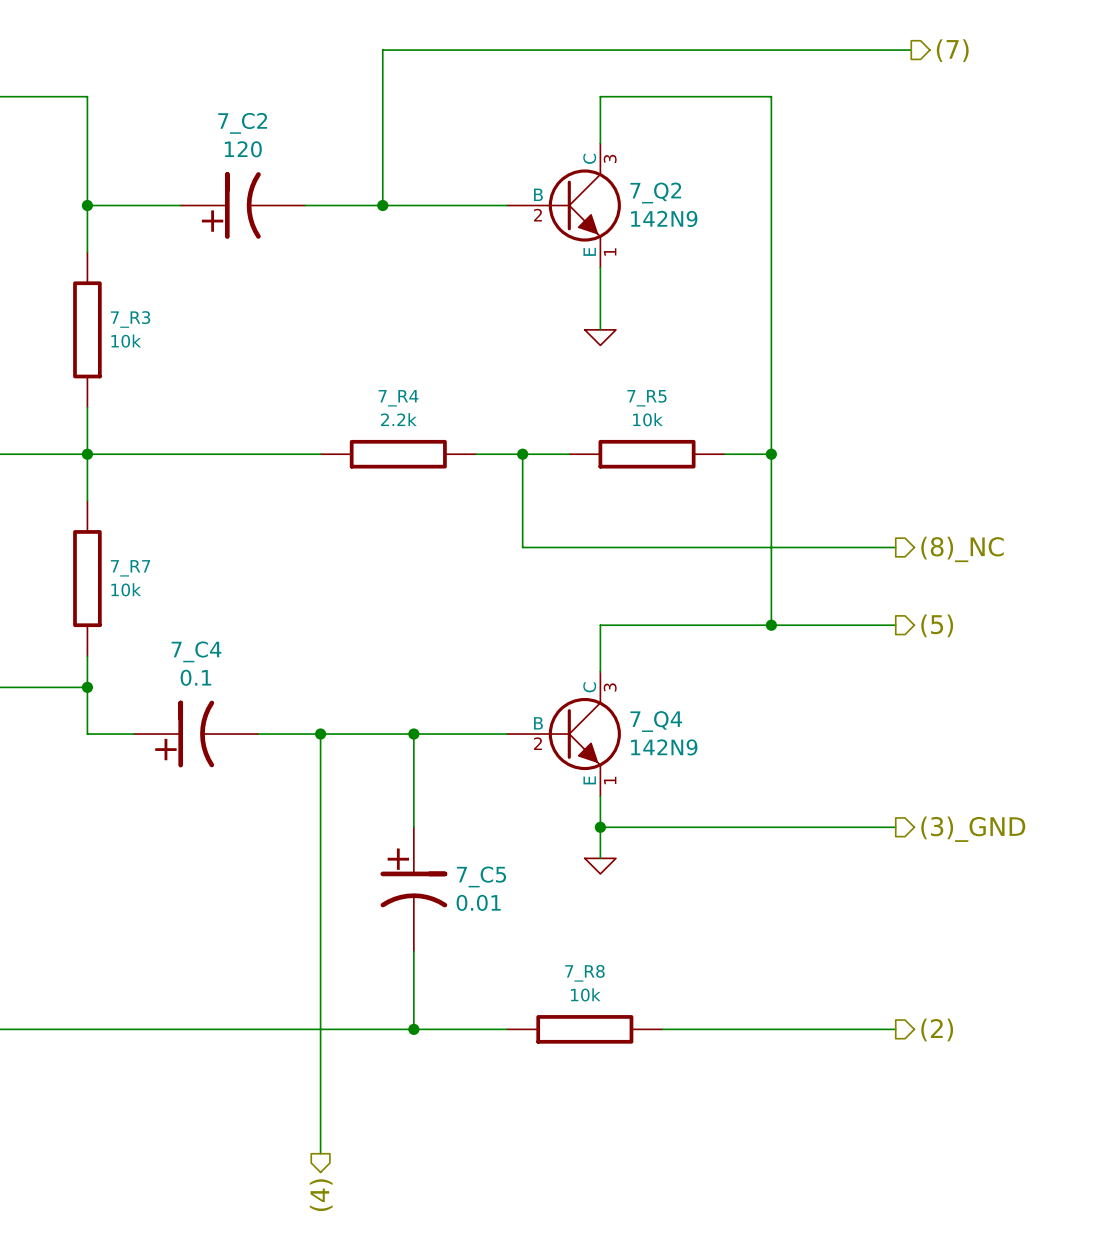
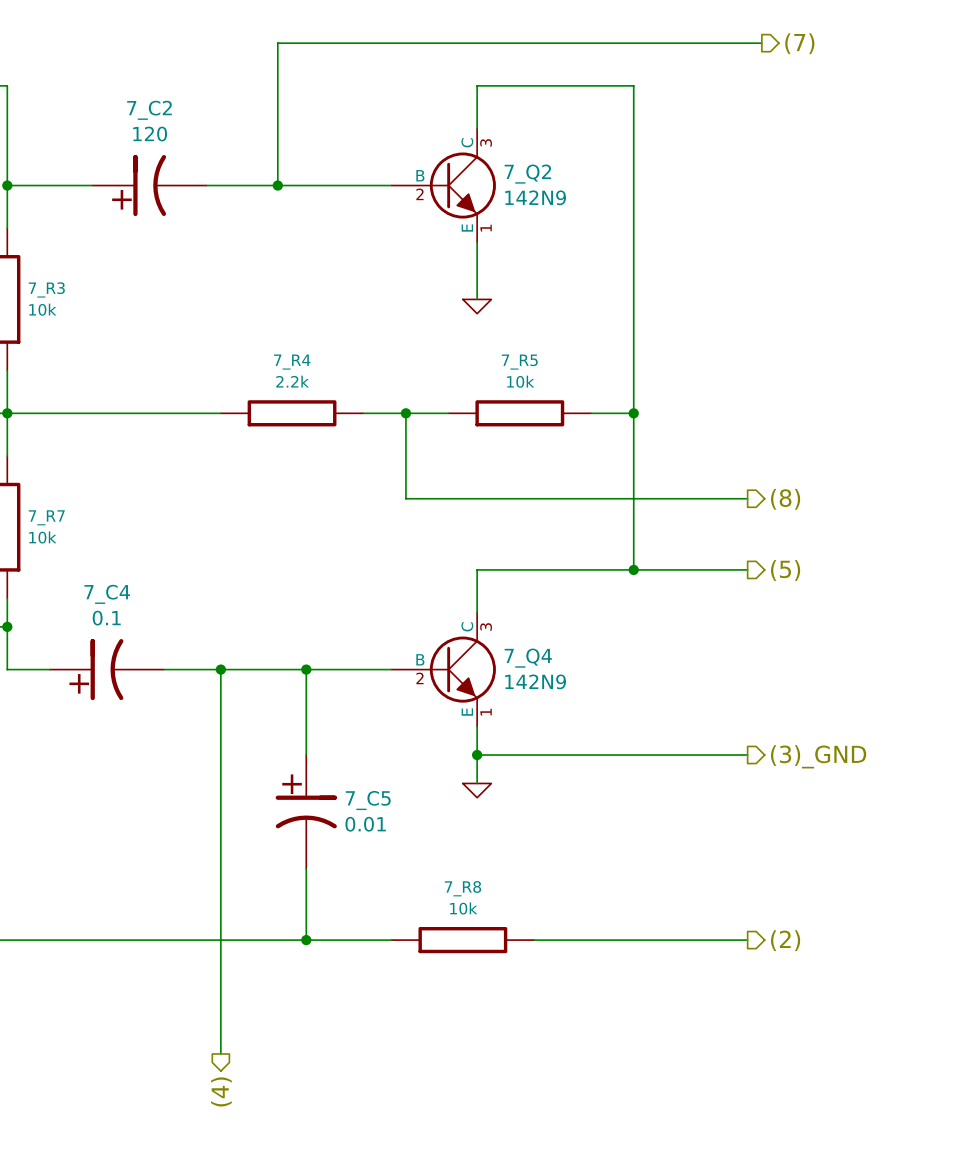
hierarchical label: (8)_NC (962, 549) -> (8) (785, 499)

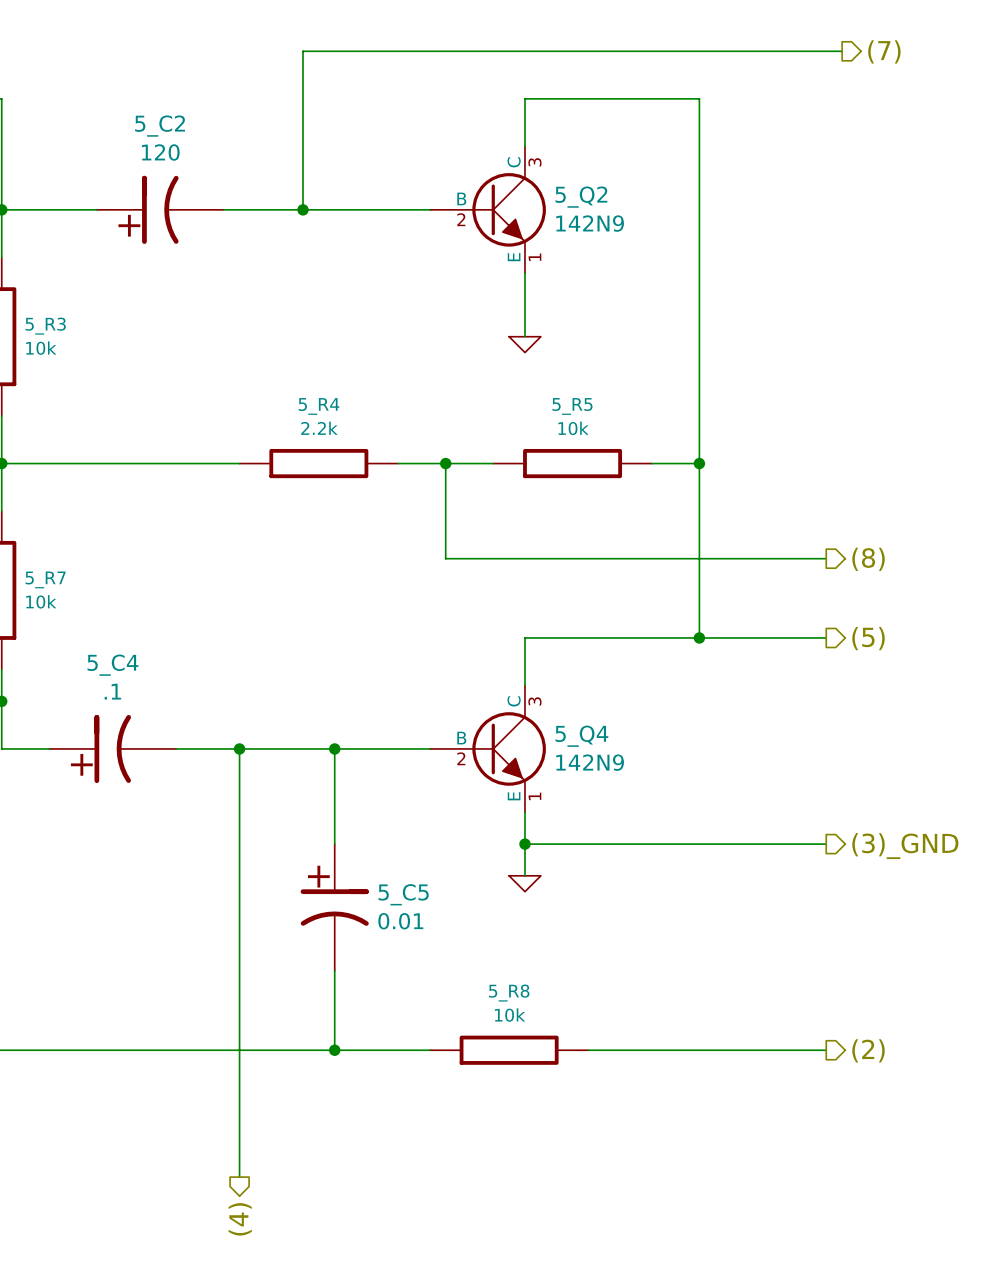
7_C2 name: 7_C2 (149, 110) -> 5_C2 (160, 126)
7_Q2 name: 7_Q2 (527, 174) -> 5_Q2 (581, 197)
7_R3 name: 7_R3 (46, 289) -> 5_R3 (45, 326)
7_R4 name: 7_R4 (292, 362) -> 5_R4 (319, 406)
7_R5 name: 7_R5 (519, 362) -> 5_R5 (572, 406)
7_R7 name: 7_R7 (46, 517) -> 5_R7 (45, 579)
7_C4 name: 7_C4 (107, 594) -> 5_C4 (112, 665)
7_C4 value: 0.1 (106, 618) -> .1 (112, 691)
7_Q4 name: 7_Q4 (528, 658) -> 5_Q4 (581, 736)
7_C5 name: 7_C5 (368, 800) -> 5_C5 (403, 894)
7_R8 name: 7_R8 (462, 888) -> 5_R8 (509, 993)

